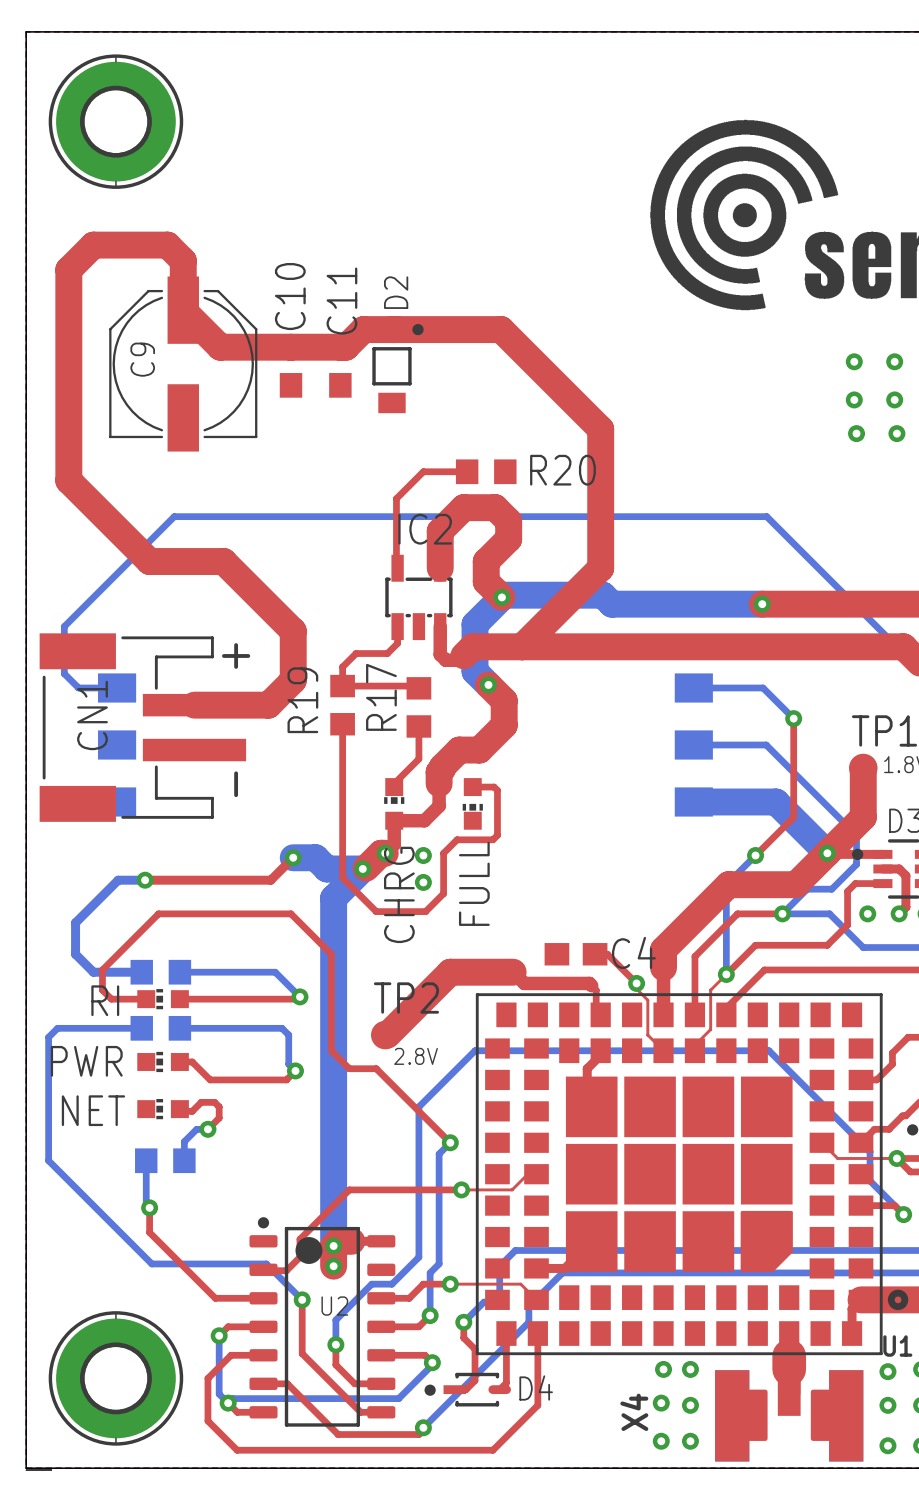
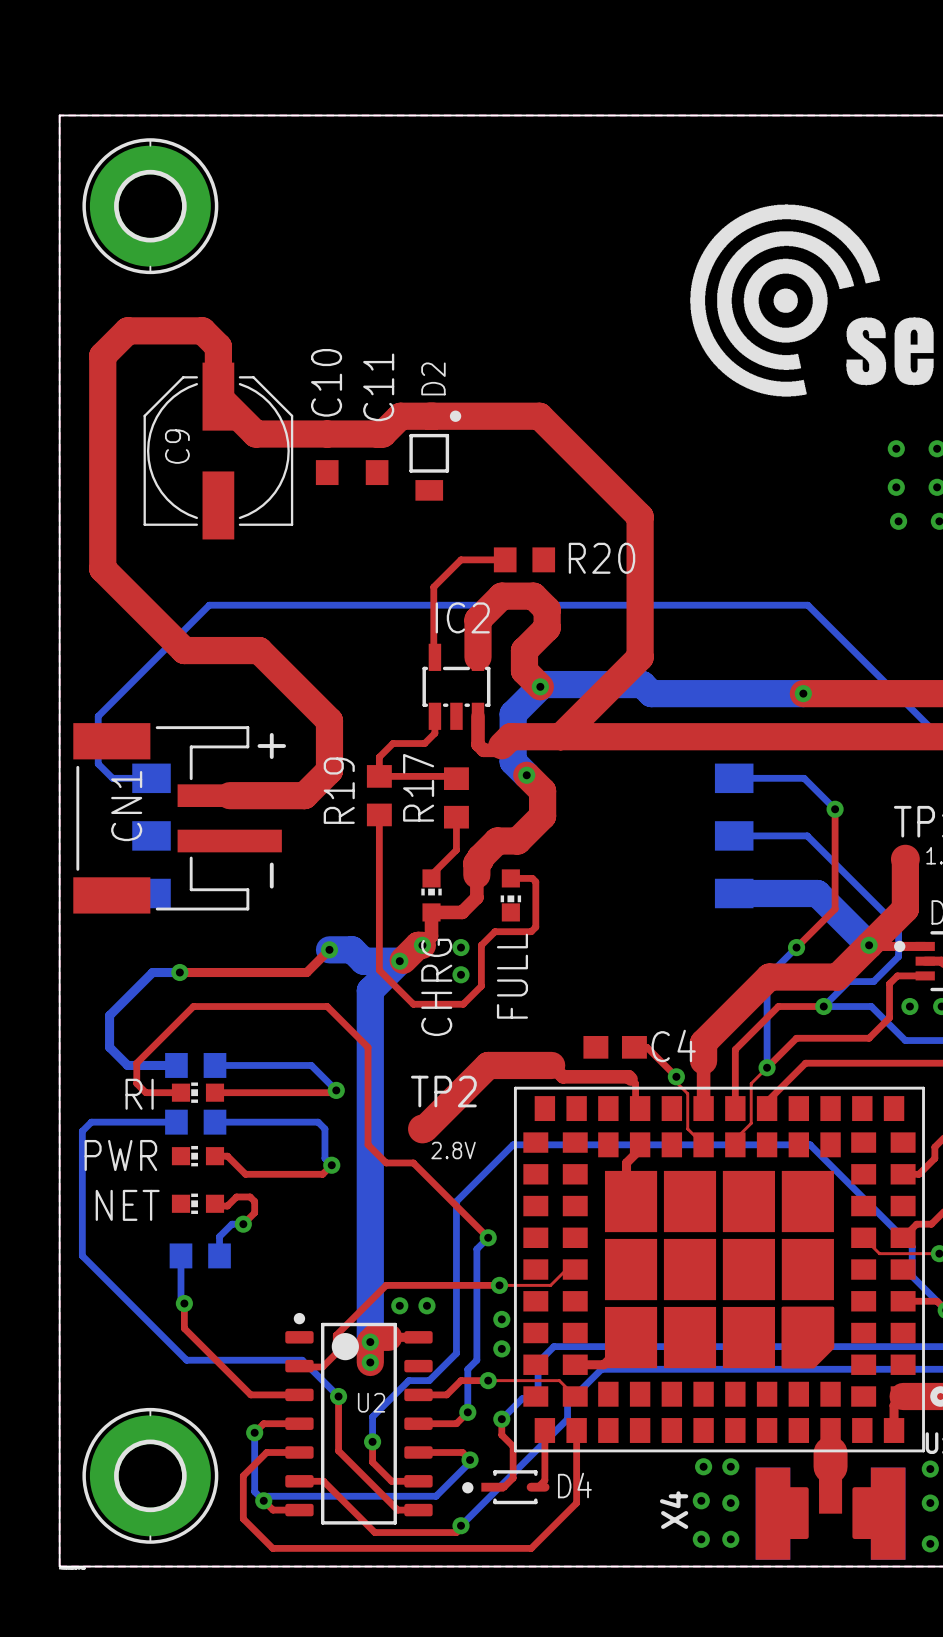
via: none -> (399, 1305)
via: none -> (426, 1305)
via: none -> (501, 1319)
via: none -> (501, 1348)

